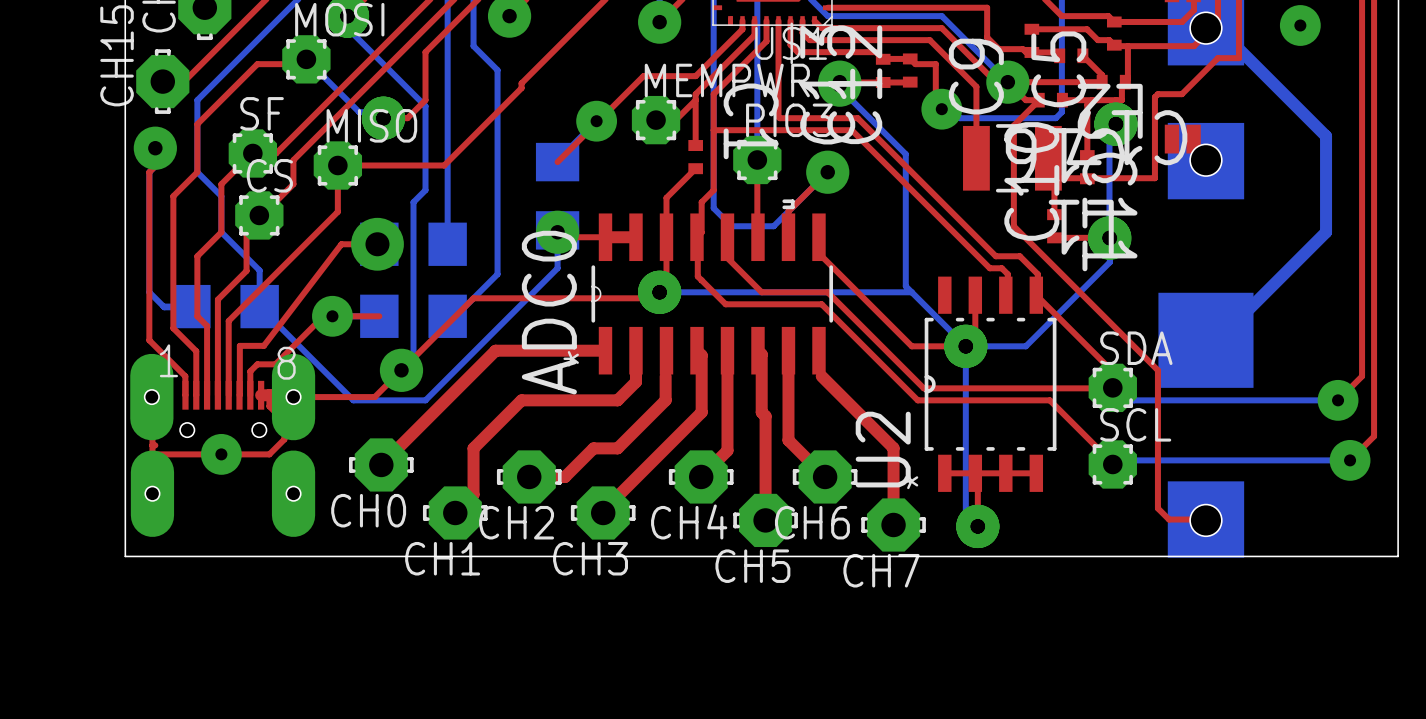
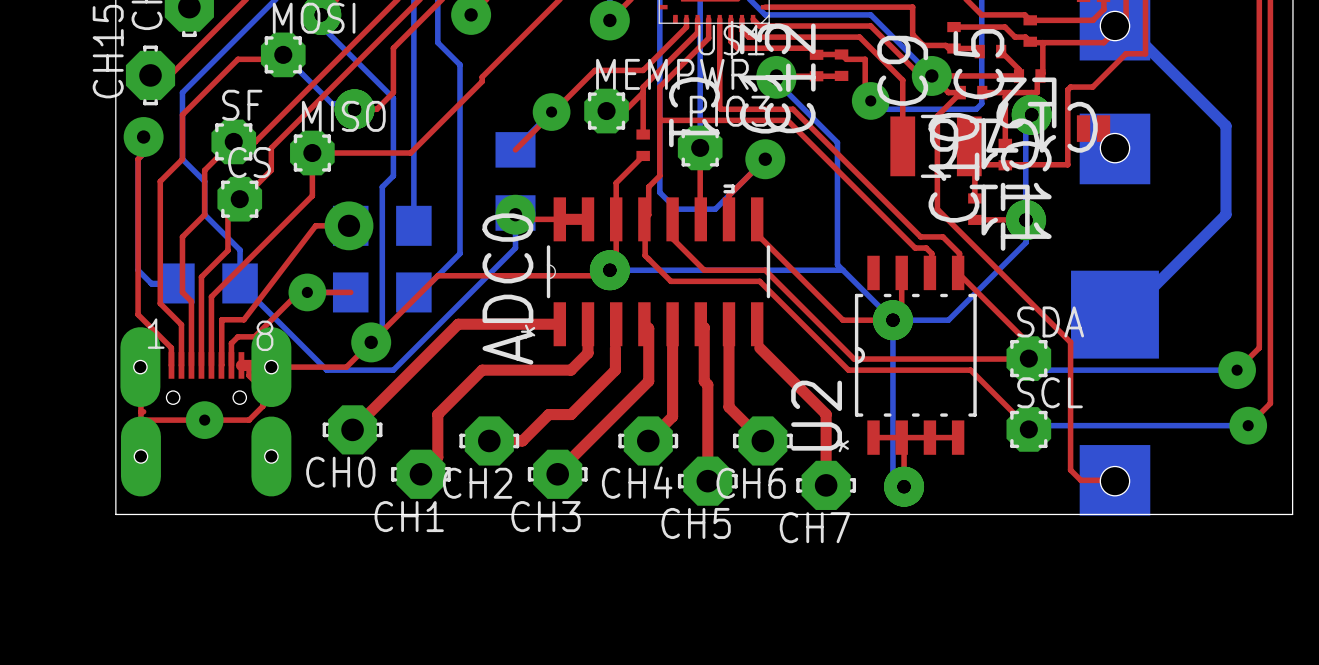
via: (1300, 25) -> none

